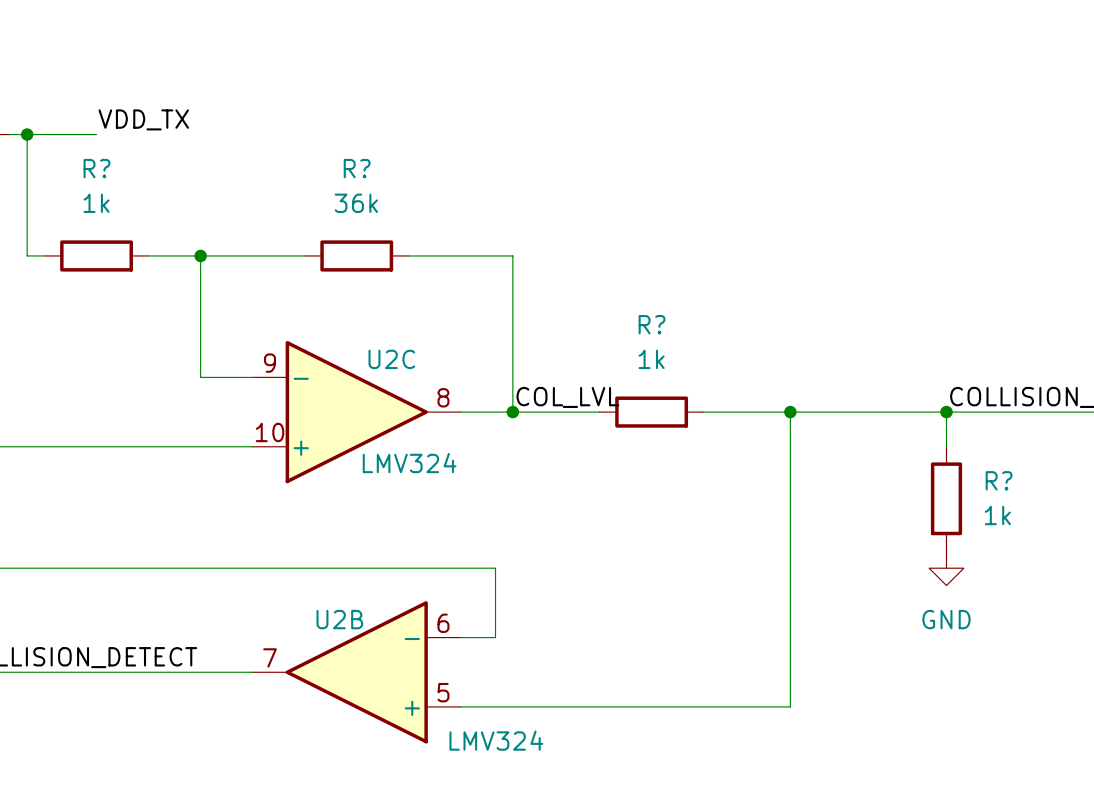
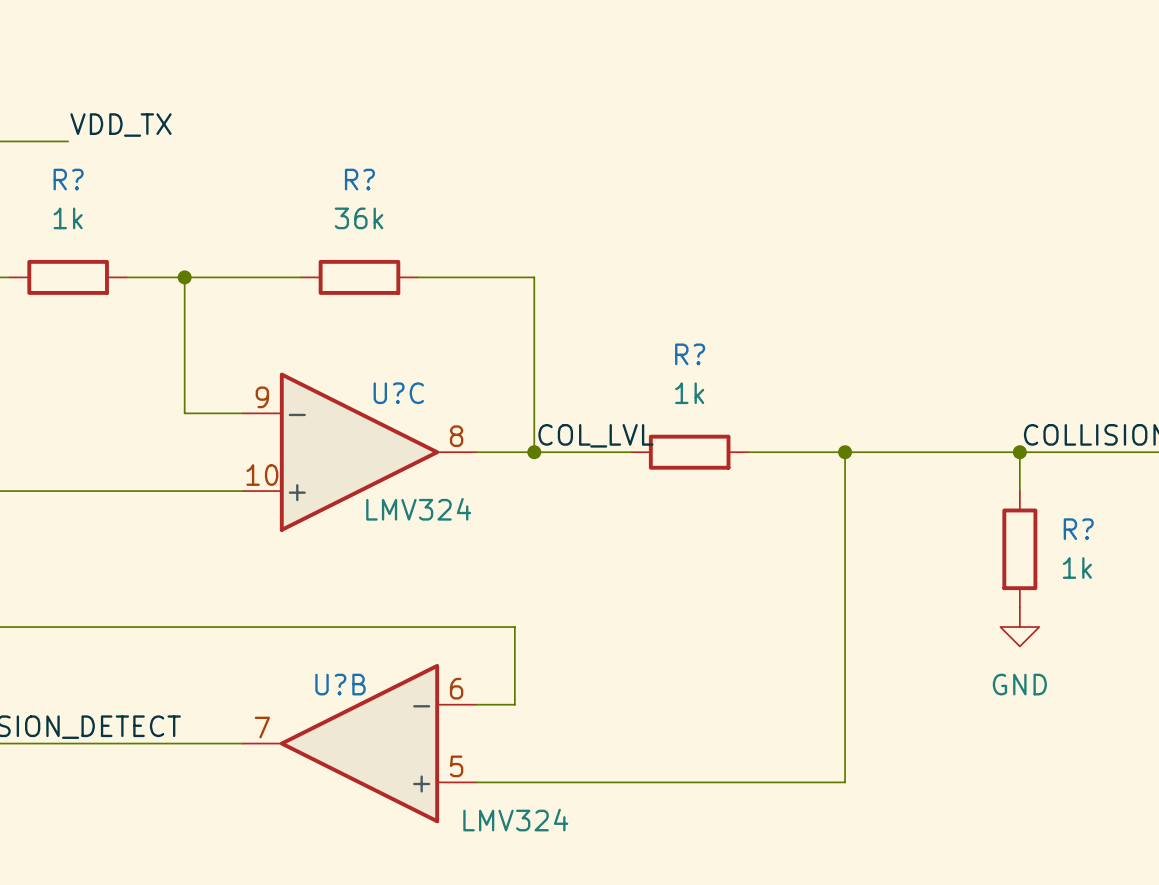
U2C name: U2C (391, 359) -> U?C (398, 393)
U2B name: U2B (339, 619) -> U?B (340, 684)

